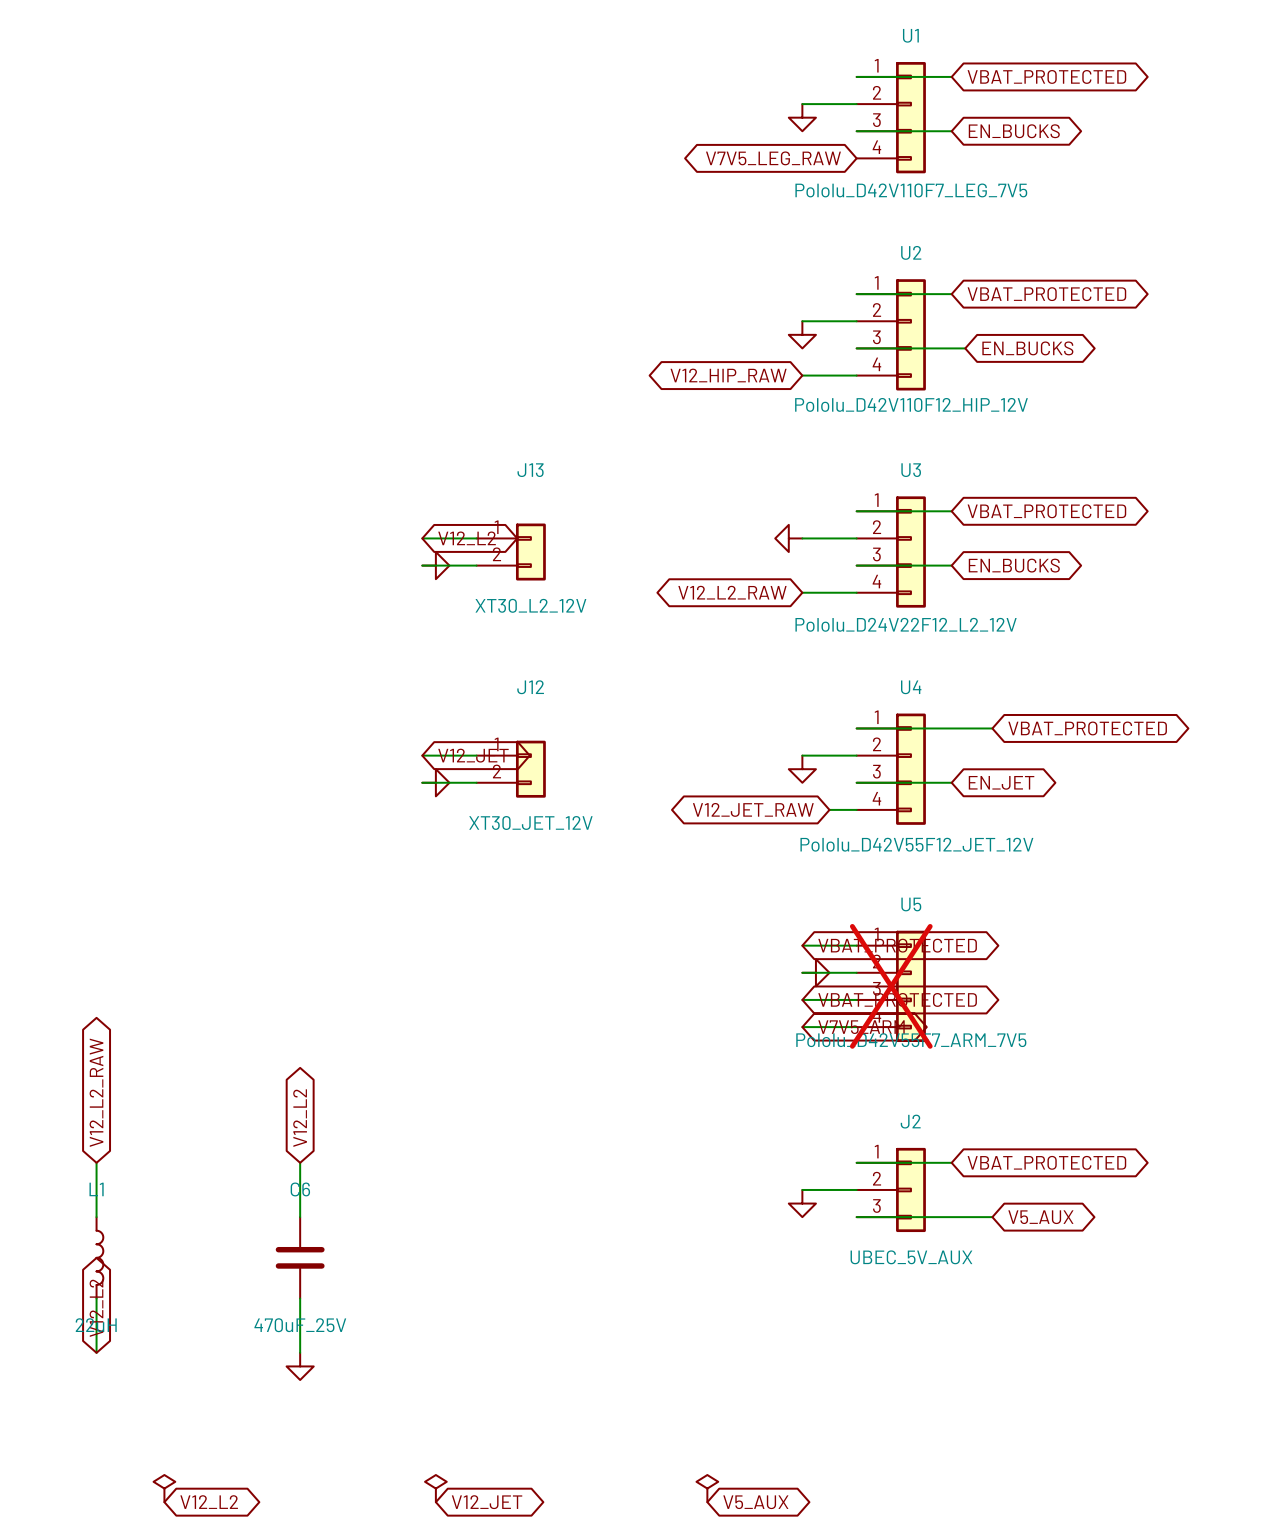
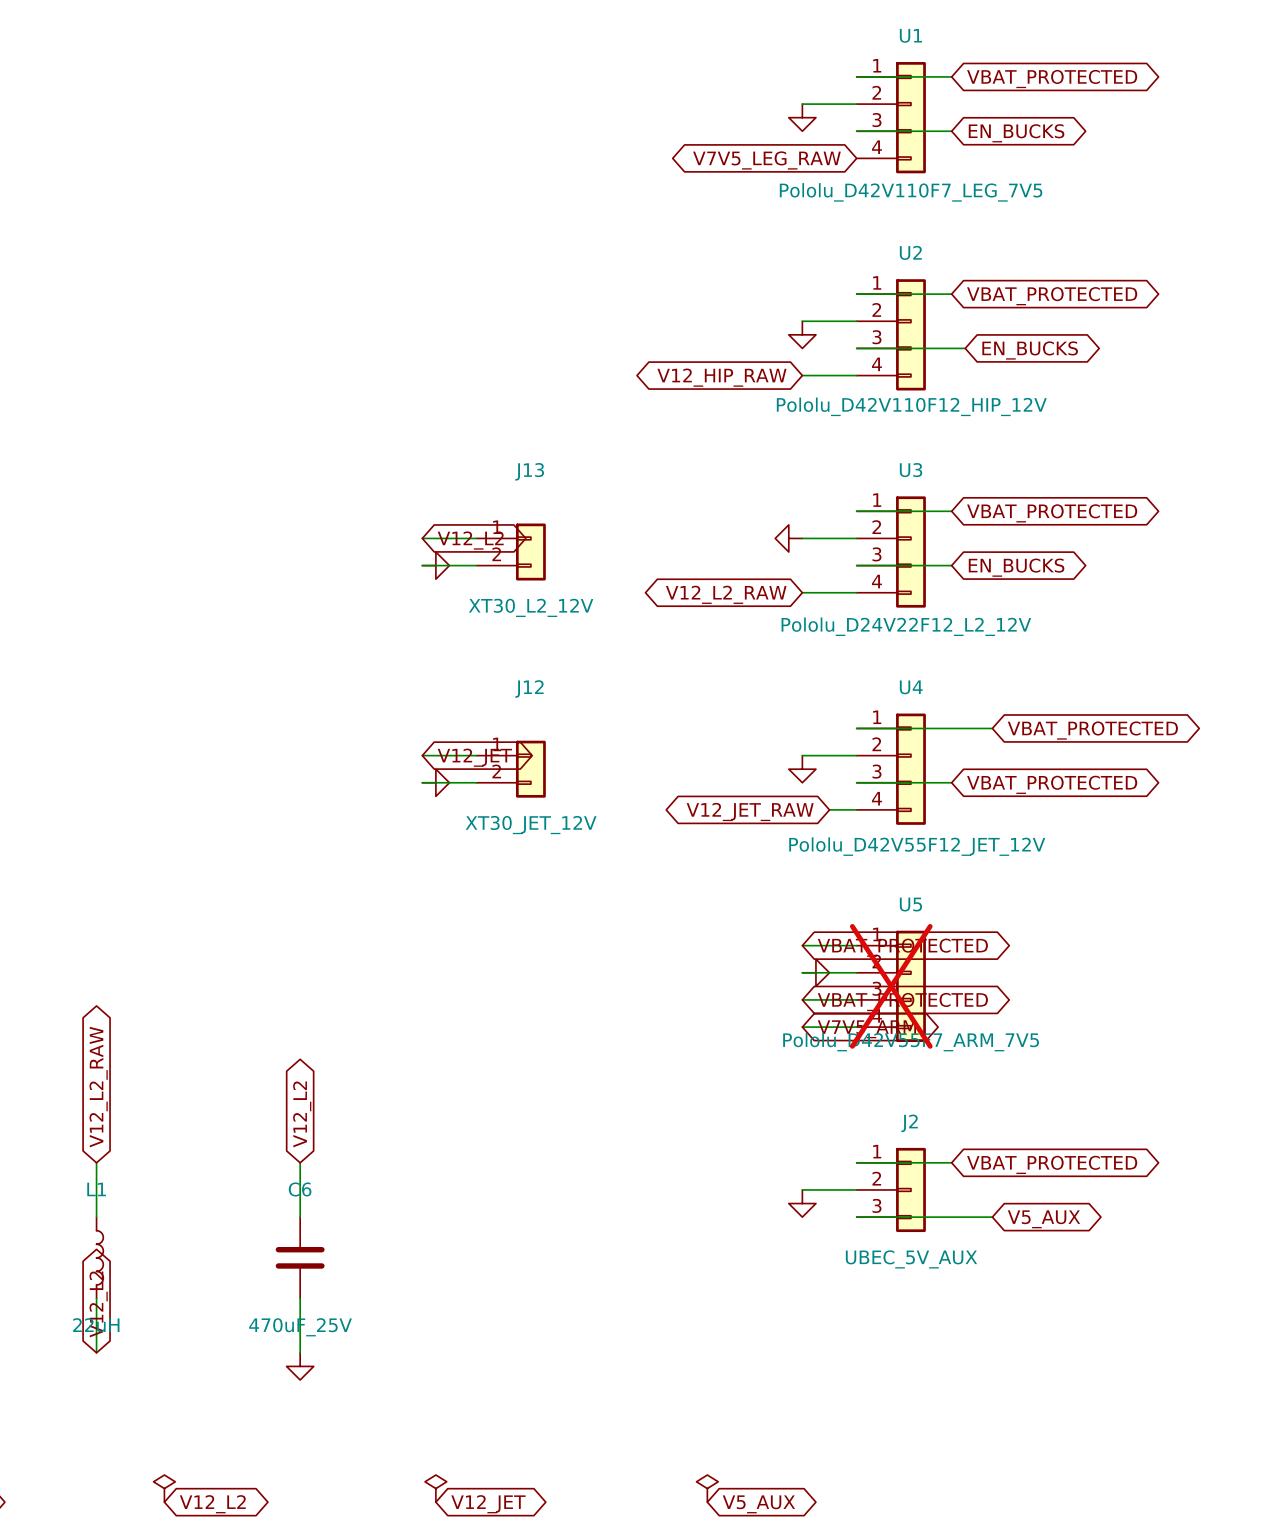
global label: EN_JET (1001, 782) -> VBAT_PROTECTED (1052, 784)

